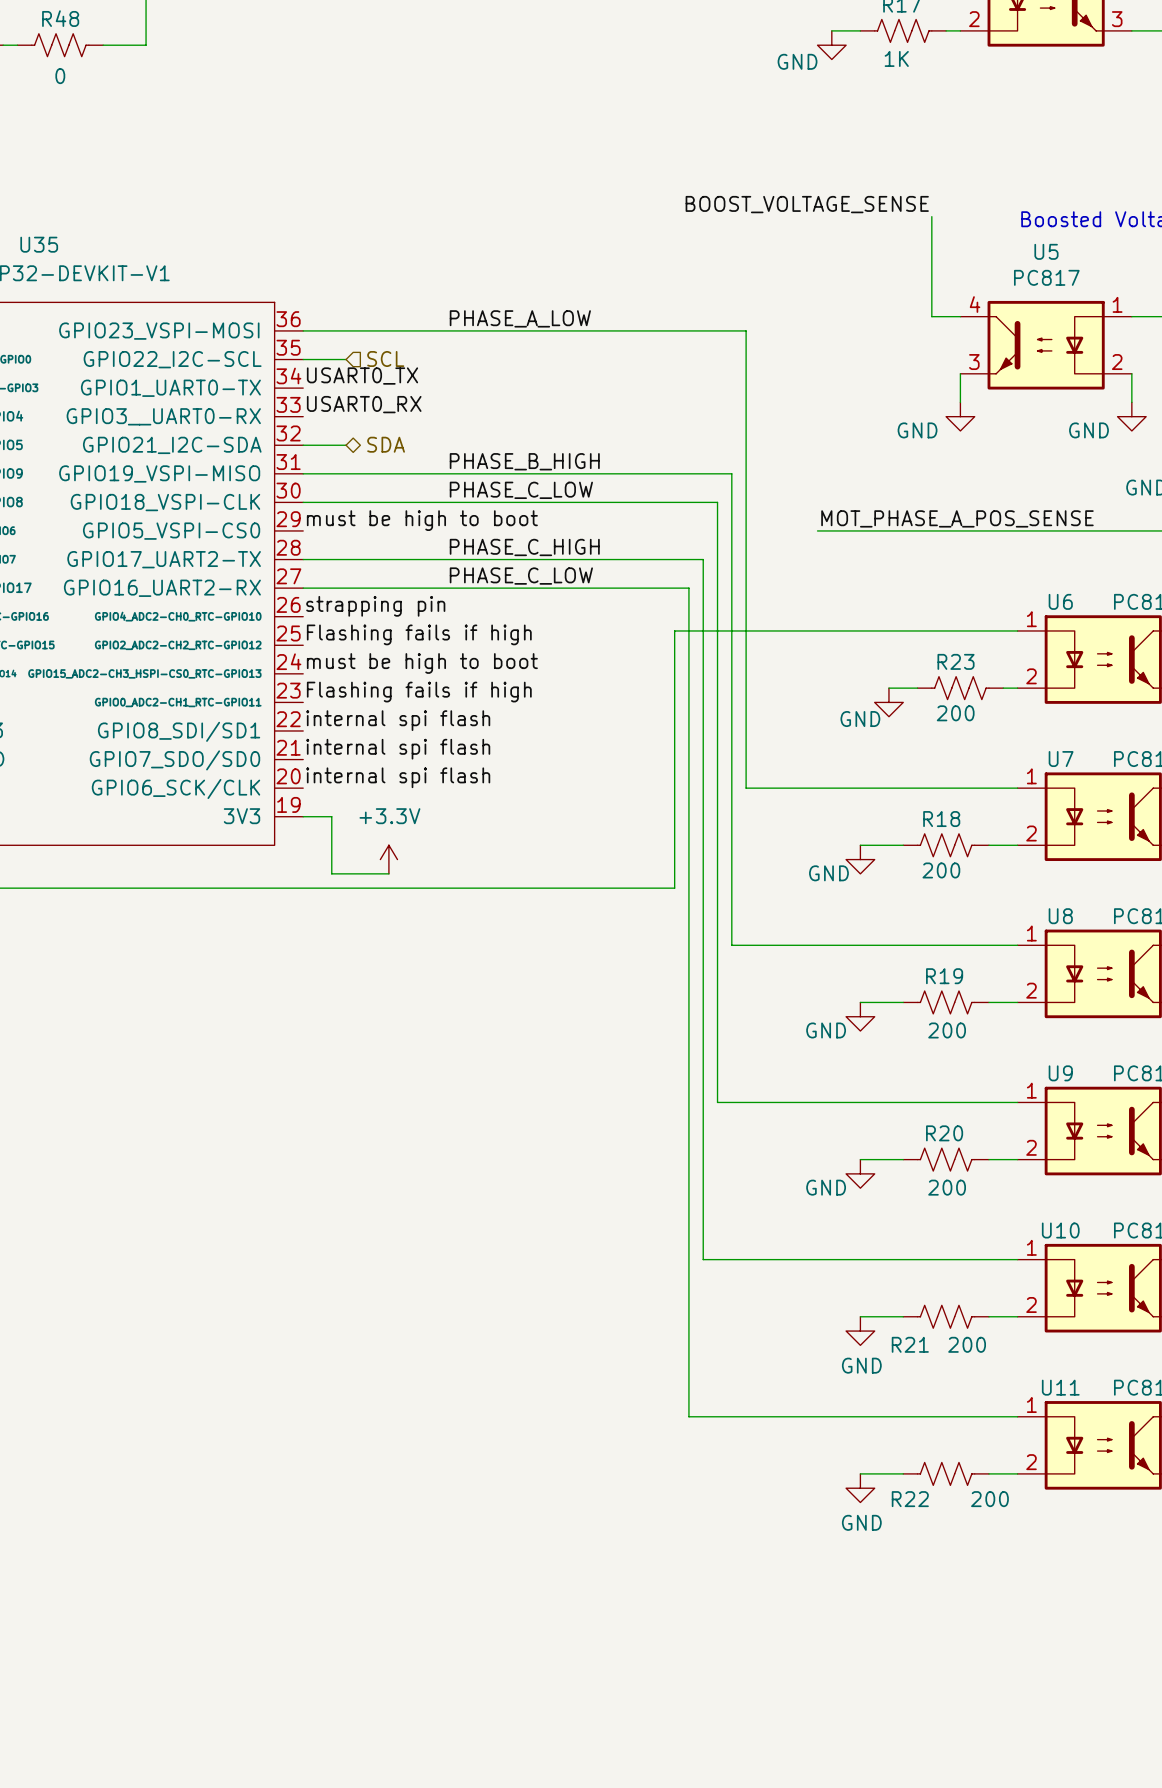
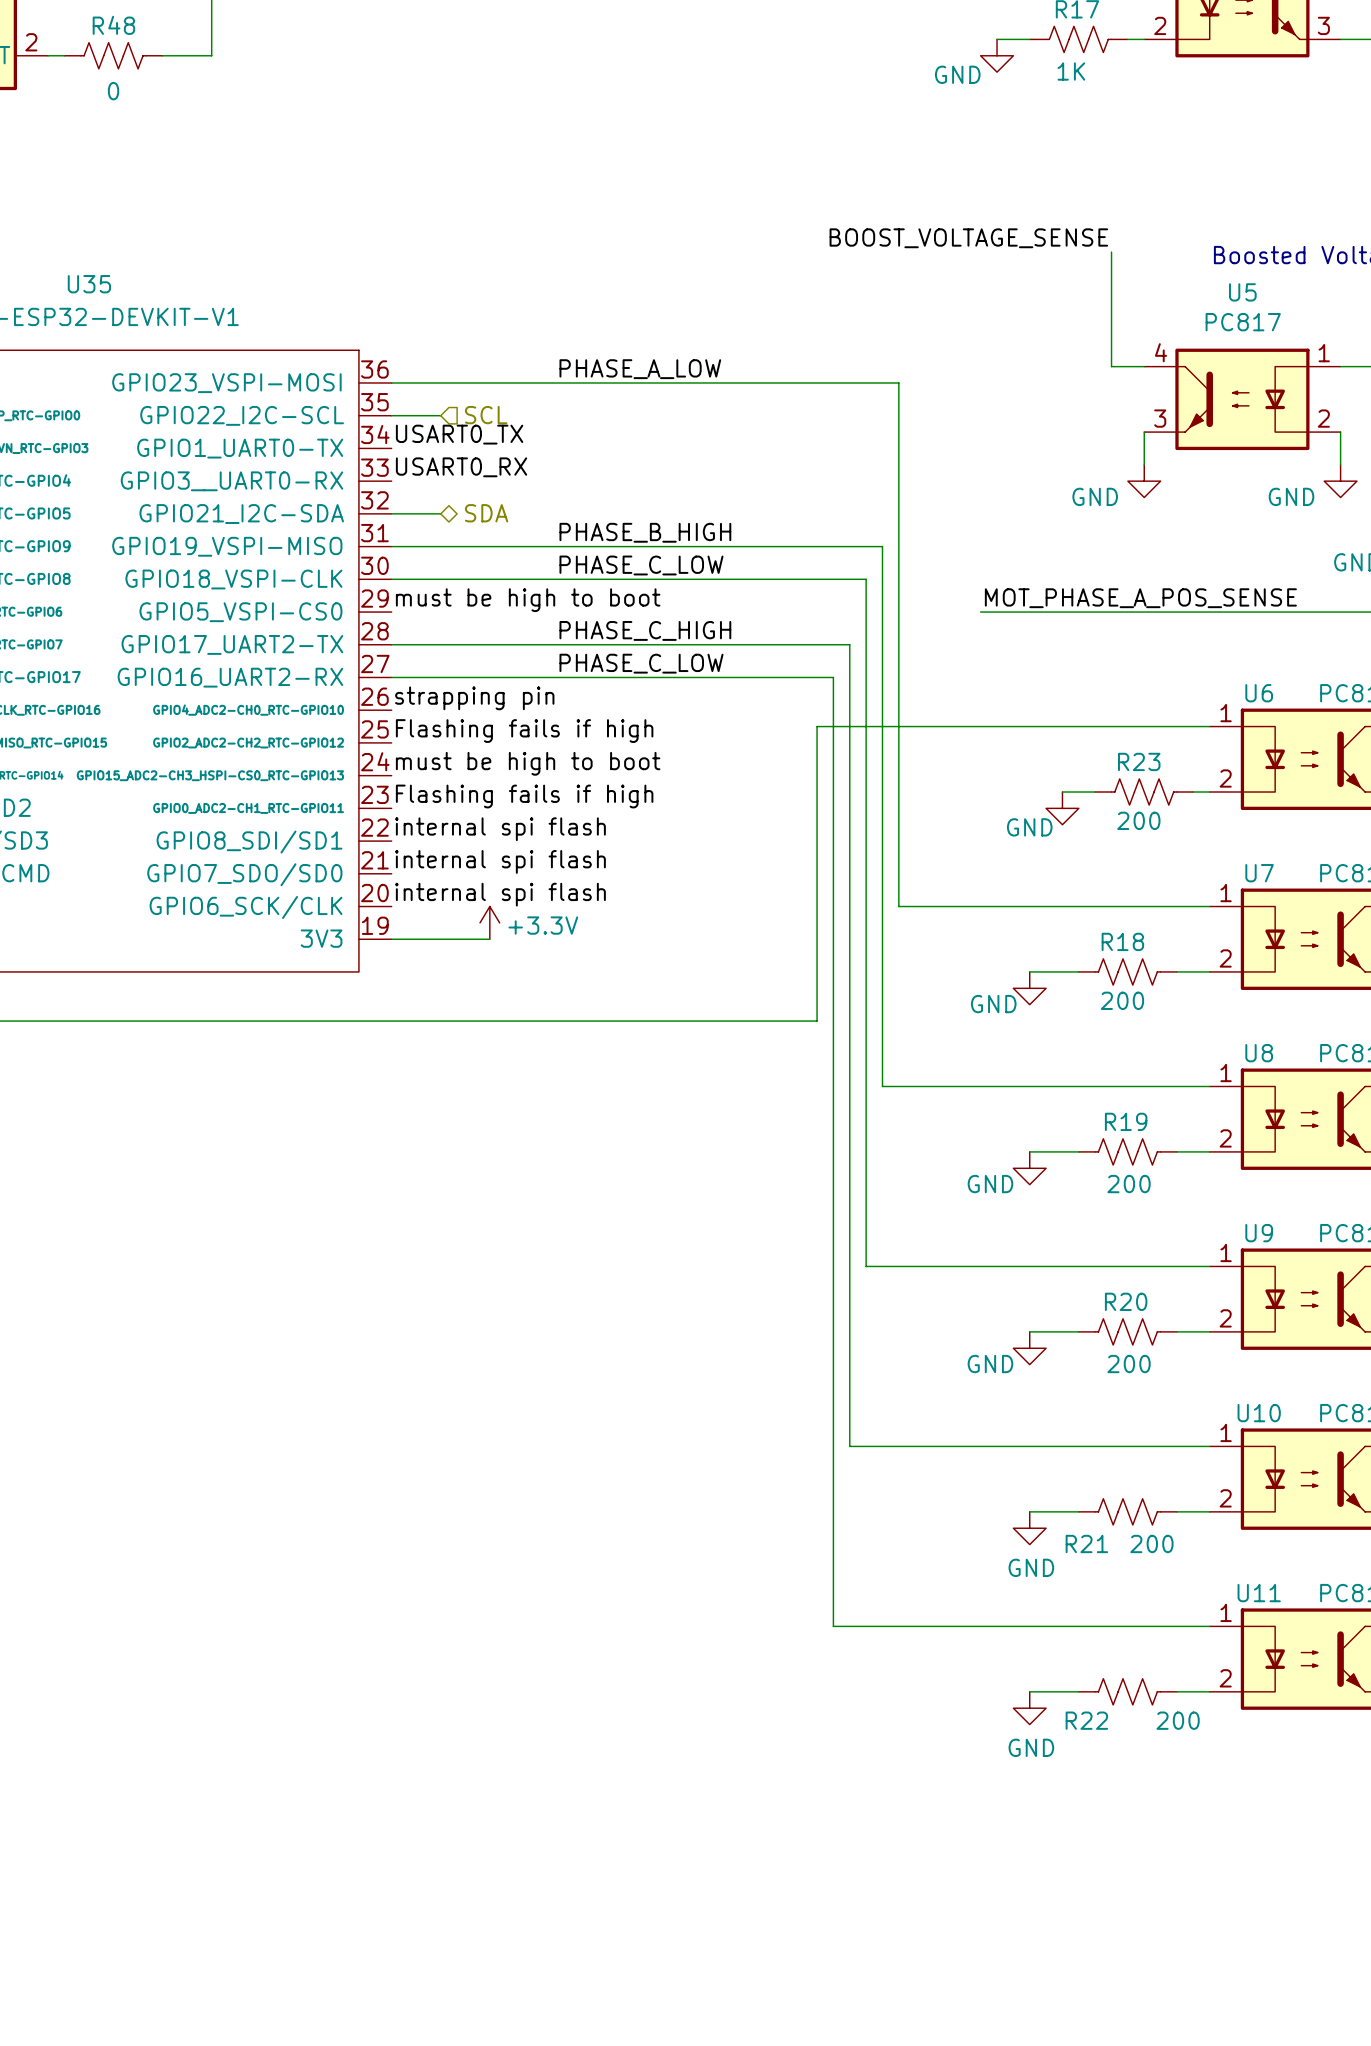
wire: (331, 816) (331, 873) (388, 873) -> (424, 939) (489, 939)
power symbol text position: +3.3V (389, 816) -> +3.3V (543, 925)
power symbol position: +3.3V (388, 859) -> +3.3V (489, 922)

